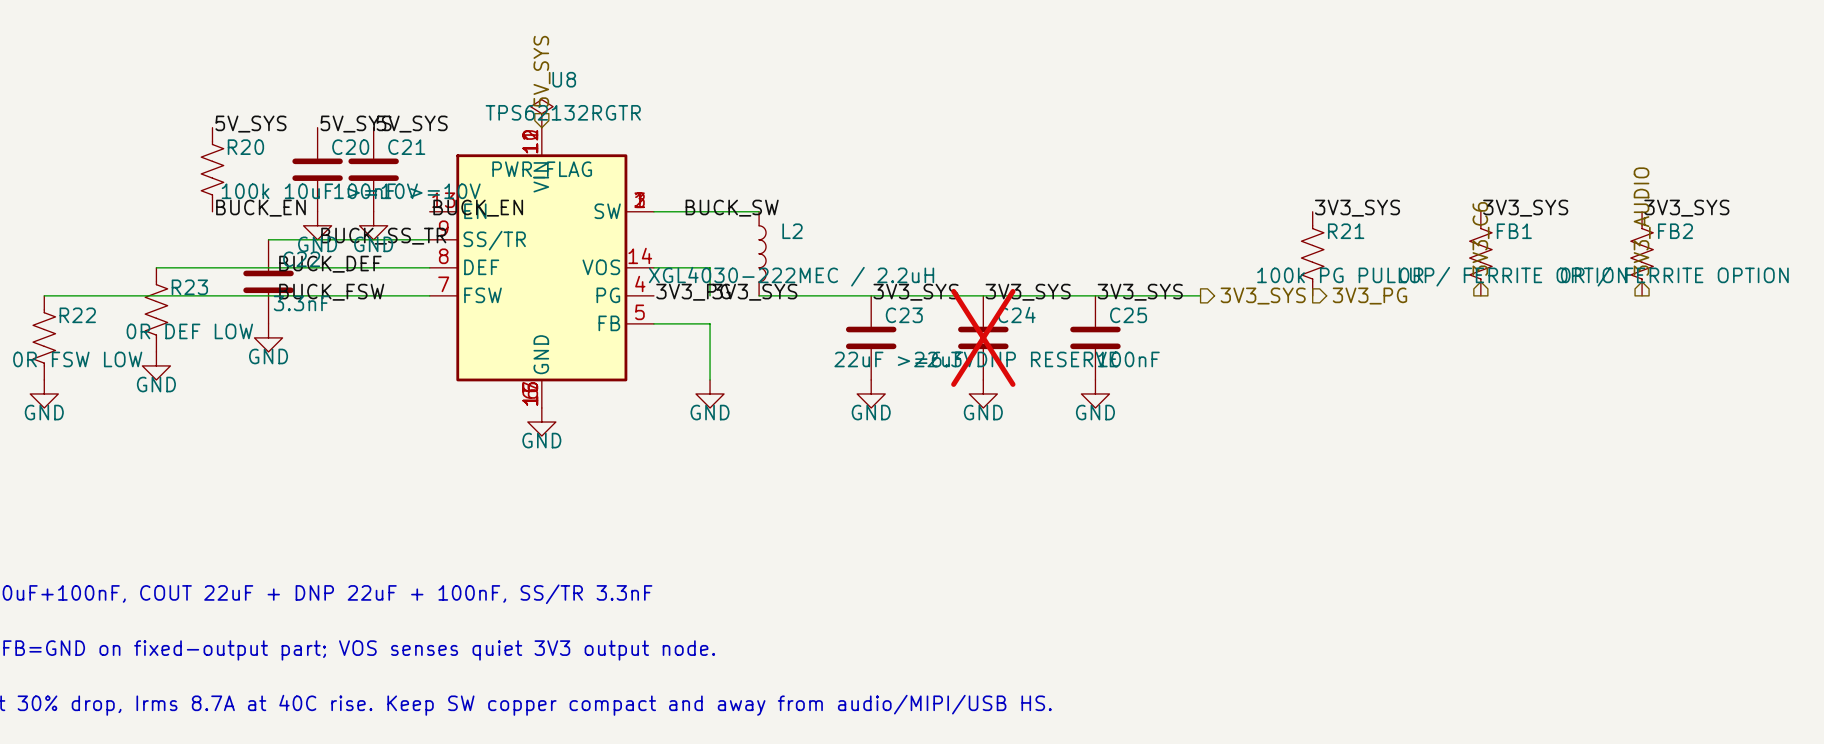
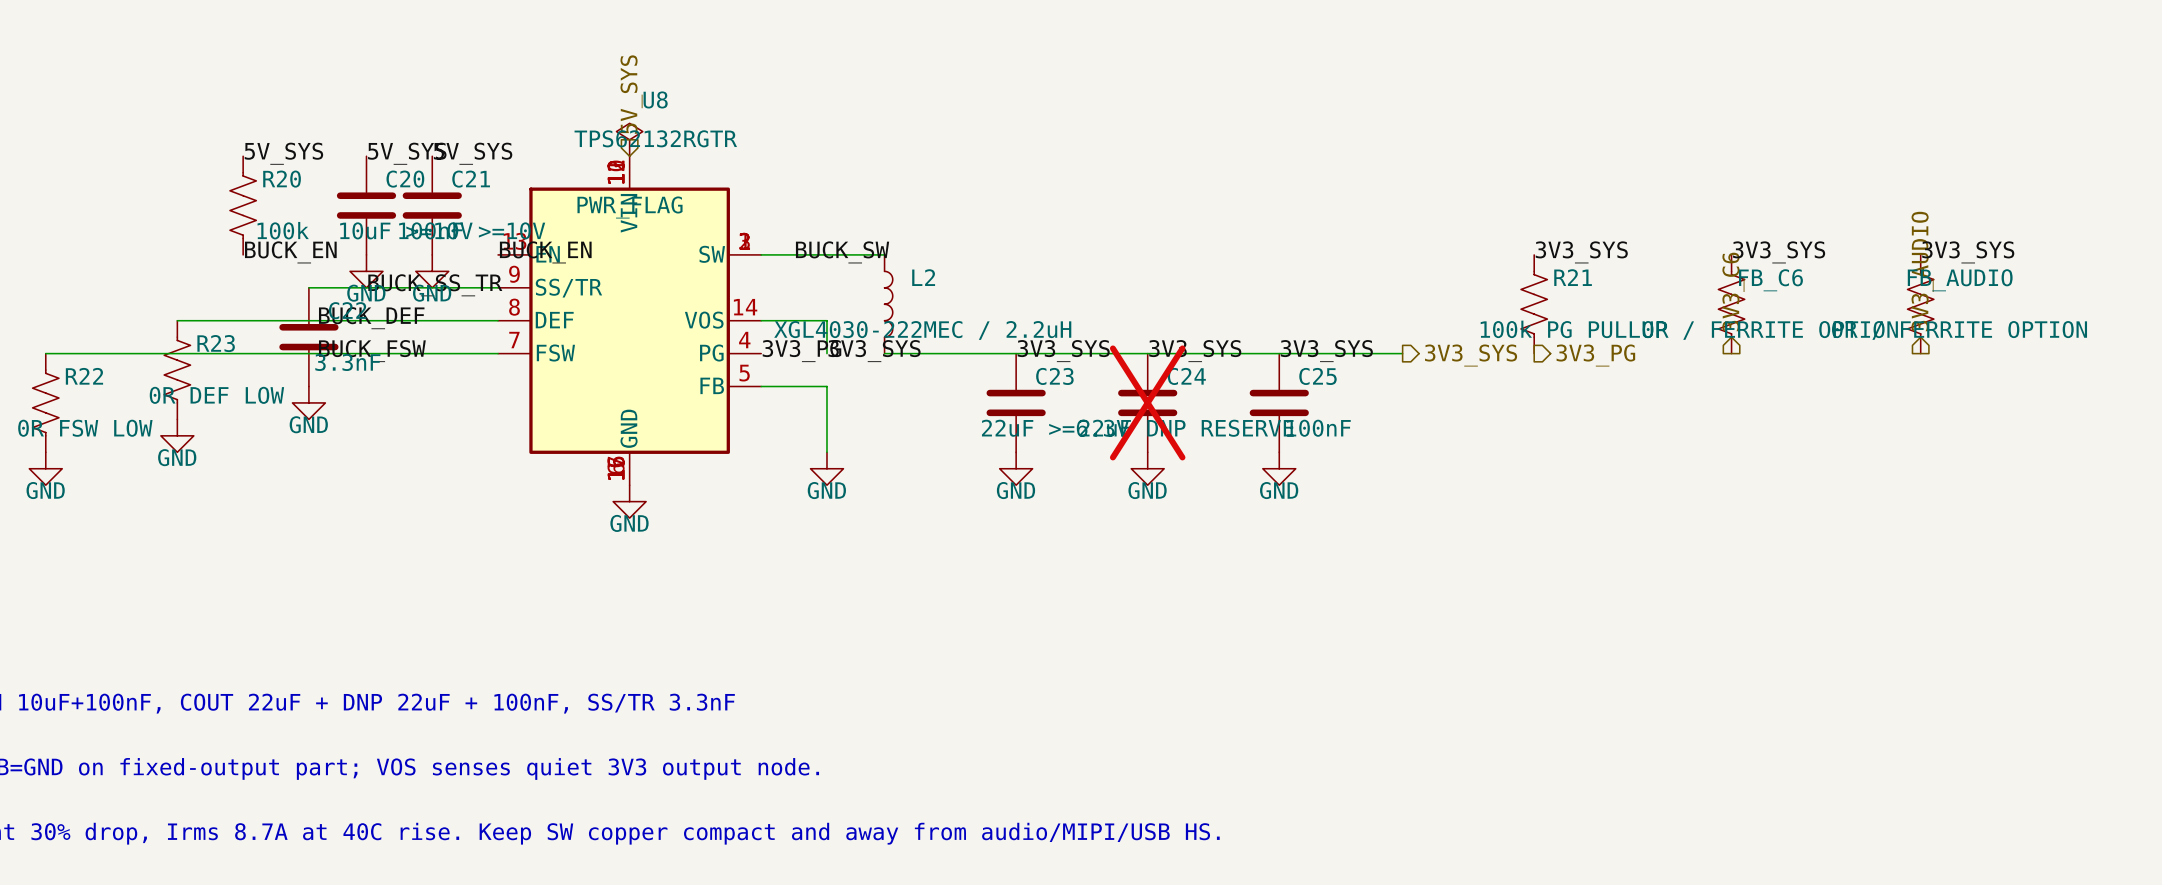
FB1 name: FB1 (1514, 231) -> FB_C6 (1770, 280)
FB2 name: FB2 (1675, 231) -> FB_AUDIO (1960, 280)

